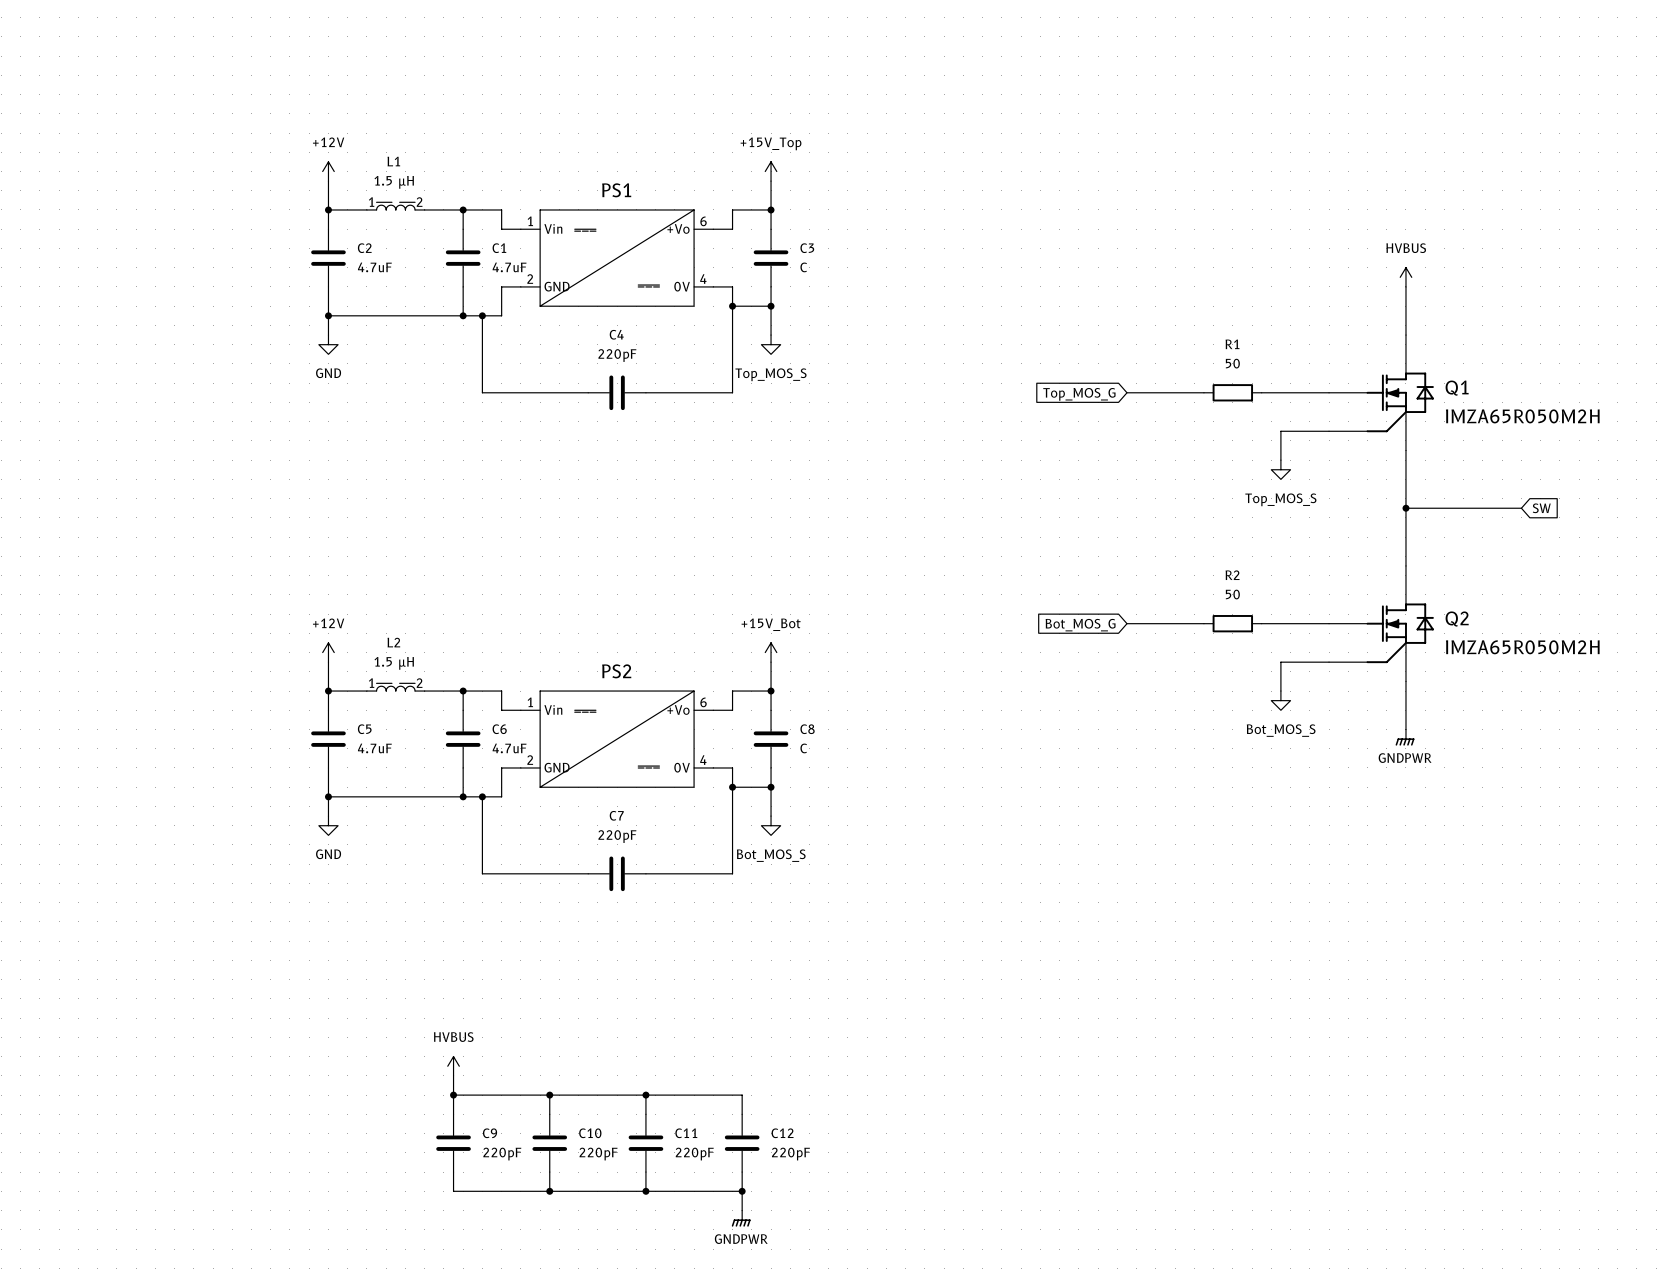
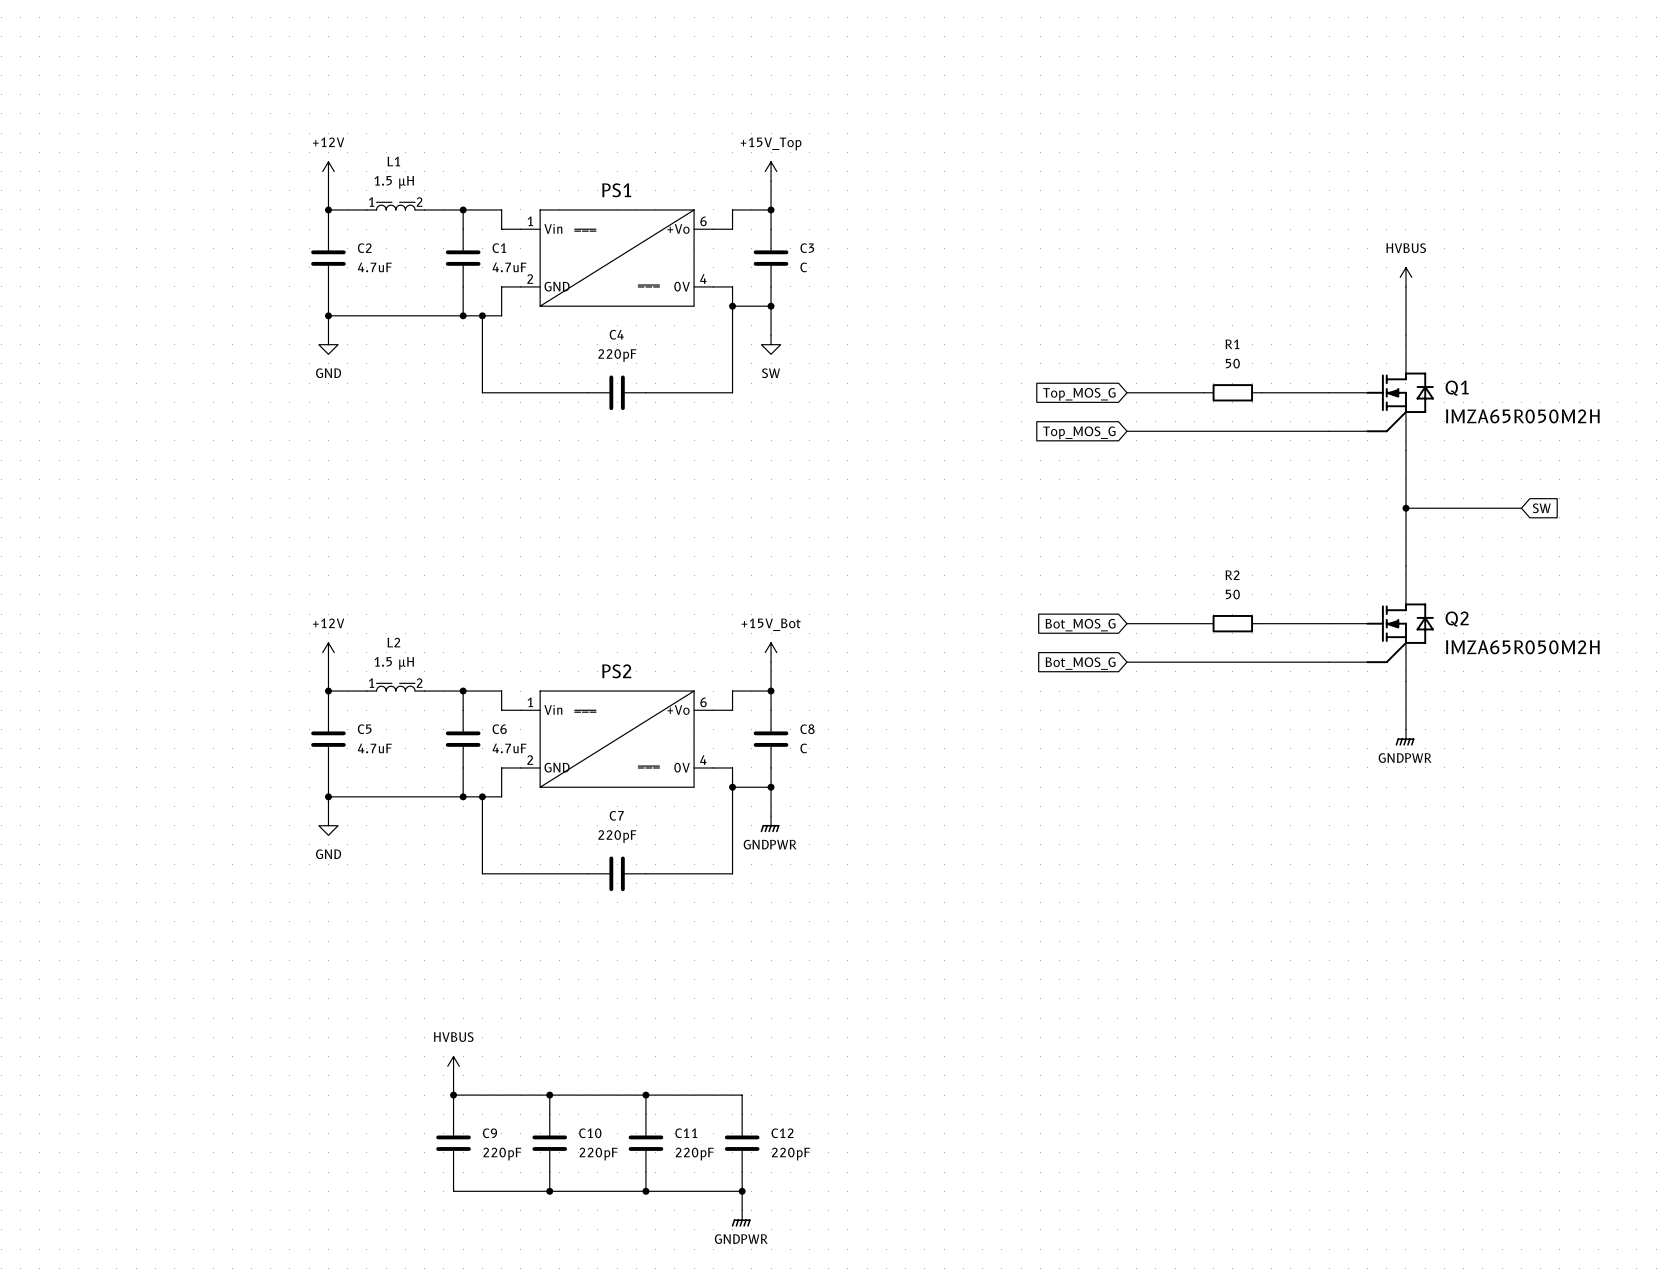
power symbol: Top_MOS_S (771, 344) -> SW (771, 344)
wire: (1280, 431) (1280, 460) -> (1280, 431) (1126, 431)
global label: none -> Top_MOS_G (1079, 432)
power symbol: Top_MOS_S (1280, 469) -> none
wire: (1280, 662) (1280, 691) -> (1280, 662) (1126, 662)
global label: none -> Bot_MOS_G (1080, 663)
power symbol: Bot_MOS_S (1280, 700) -> none
power symbol: Bot_MOS_S (771, 825) -> GNDPWR (770, 824)

